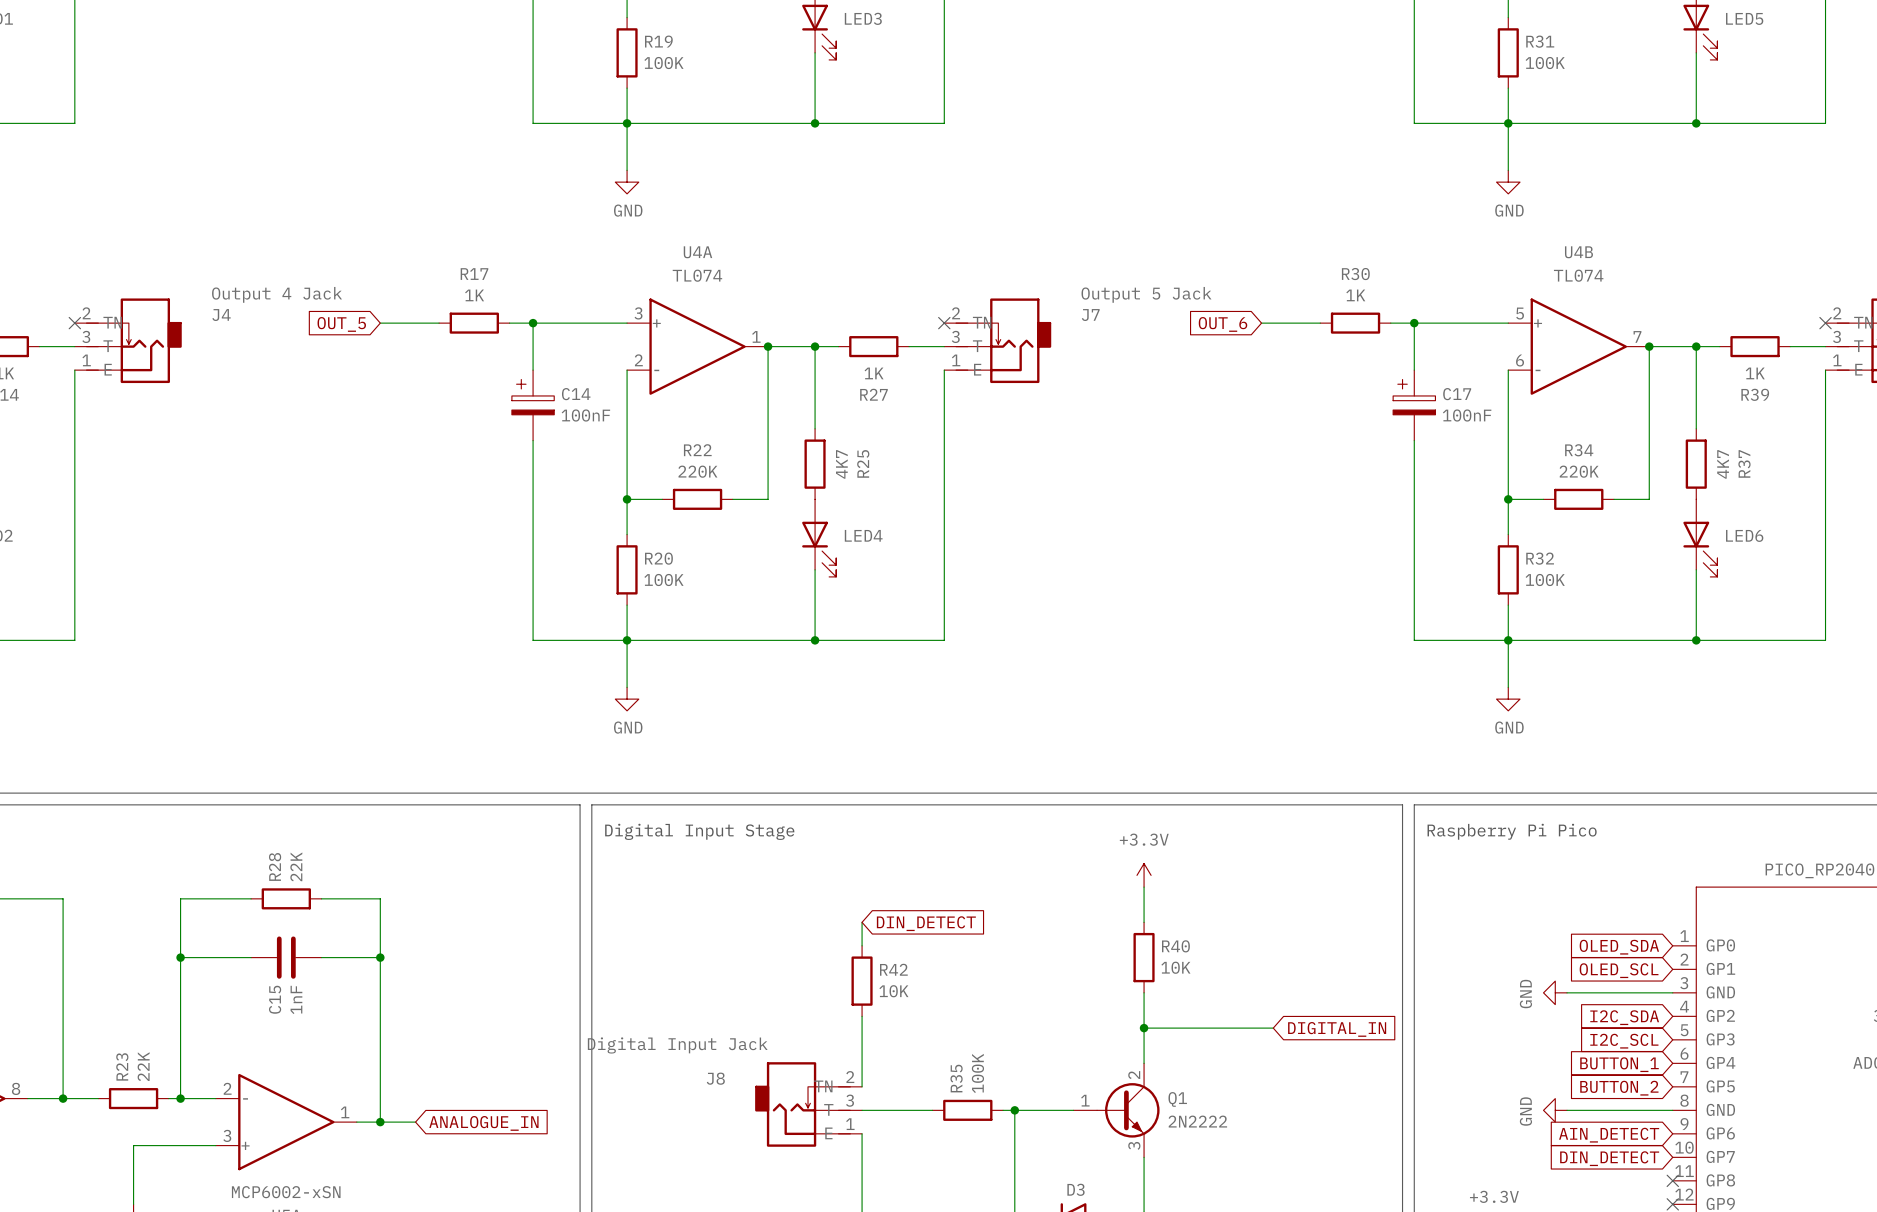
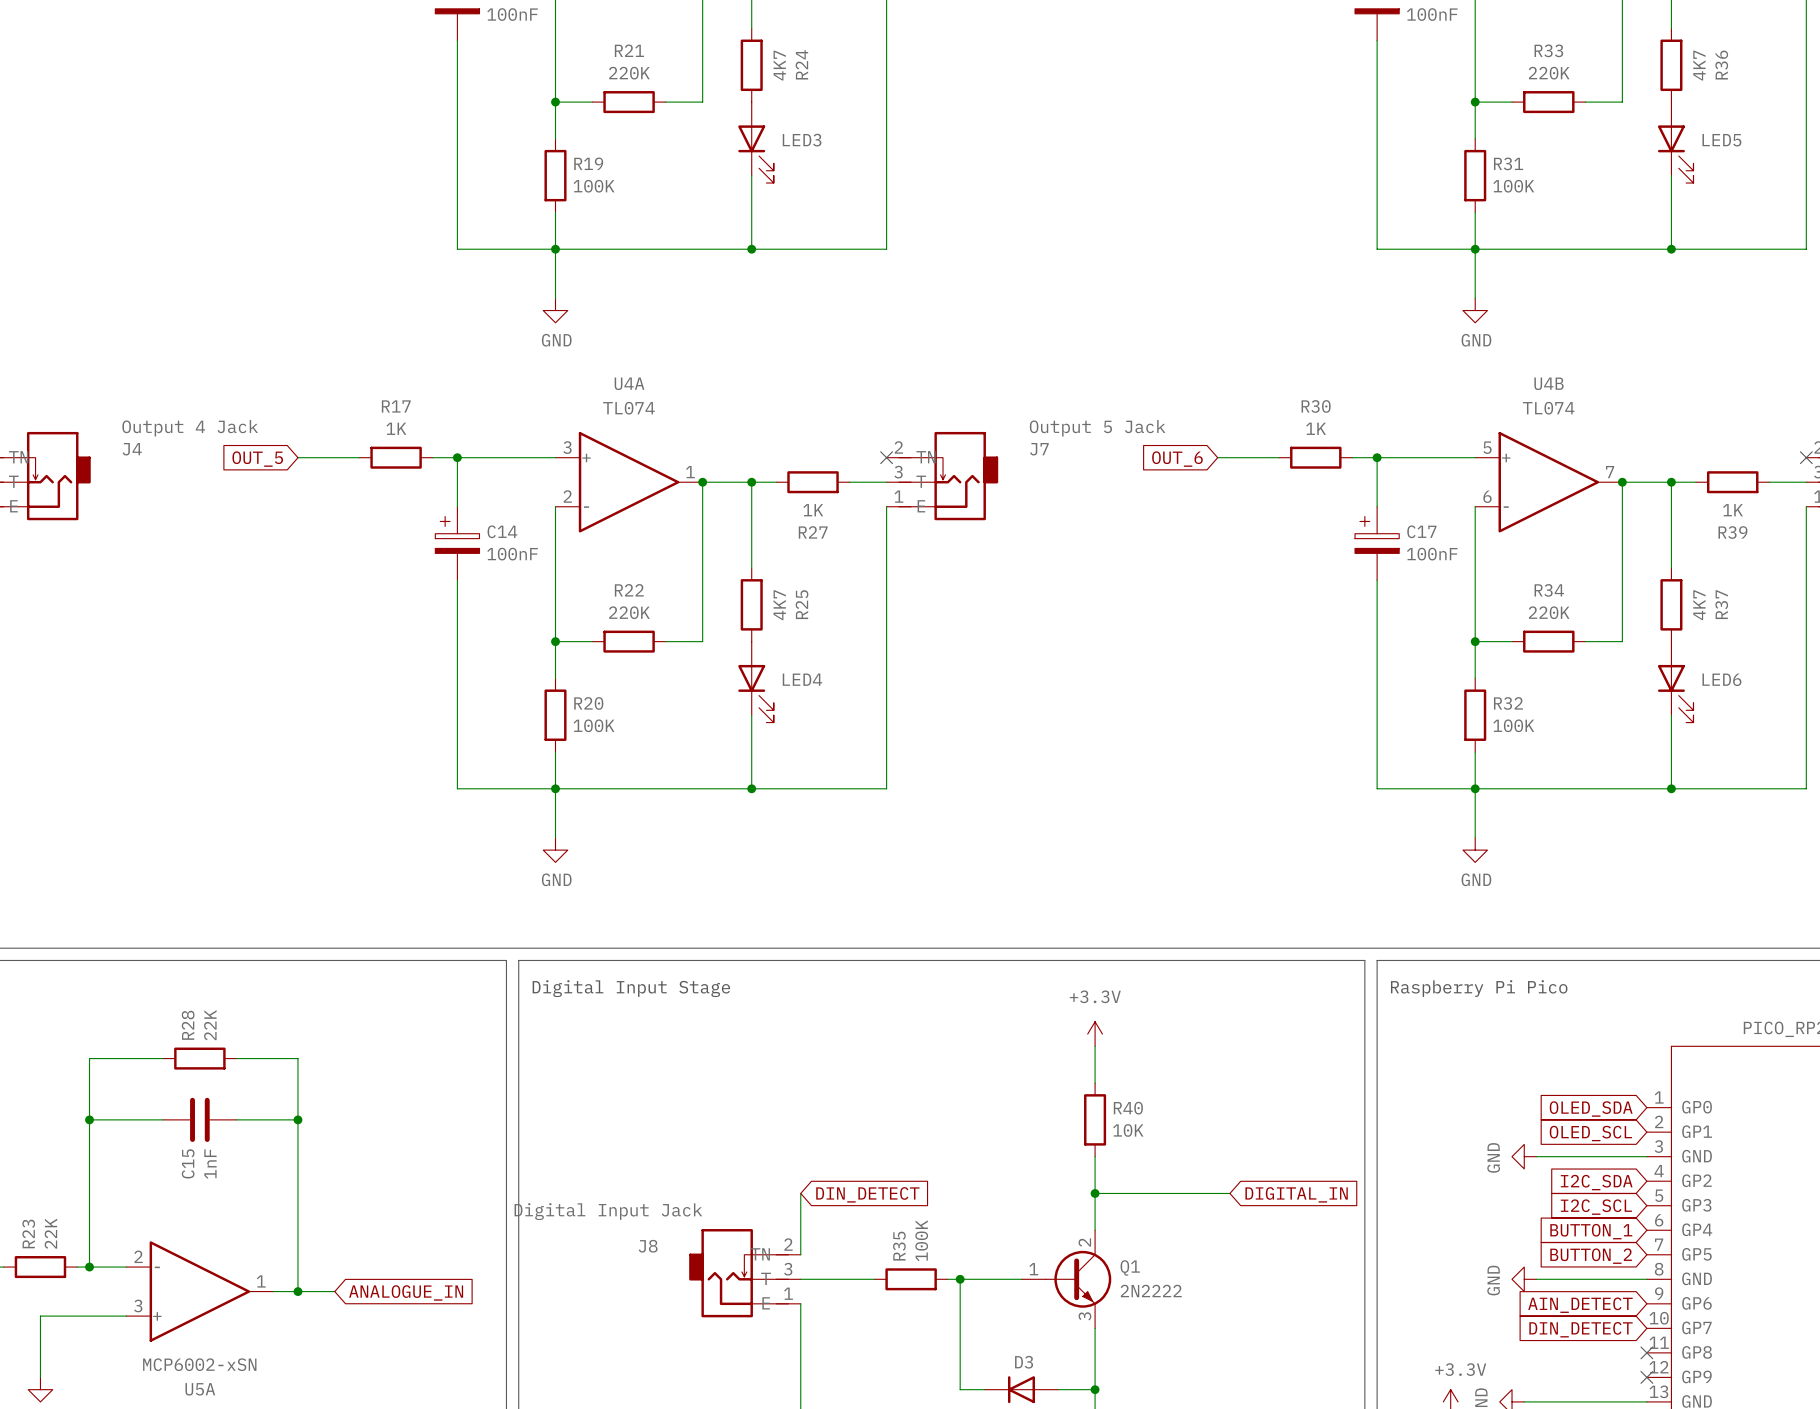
wire: (862, 922) (862, 945) -> none
global label position: DIN_DETECT (926, 923) -> DIN_DETECT (867, 1194)
R42: 10K (862, 981) -> none
wire: (862, 1016) (862, 1028) -> none

